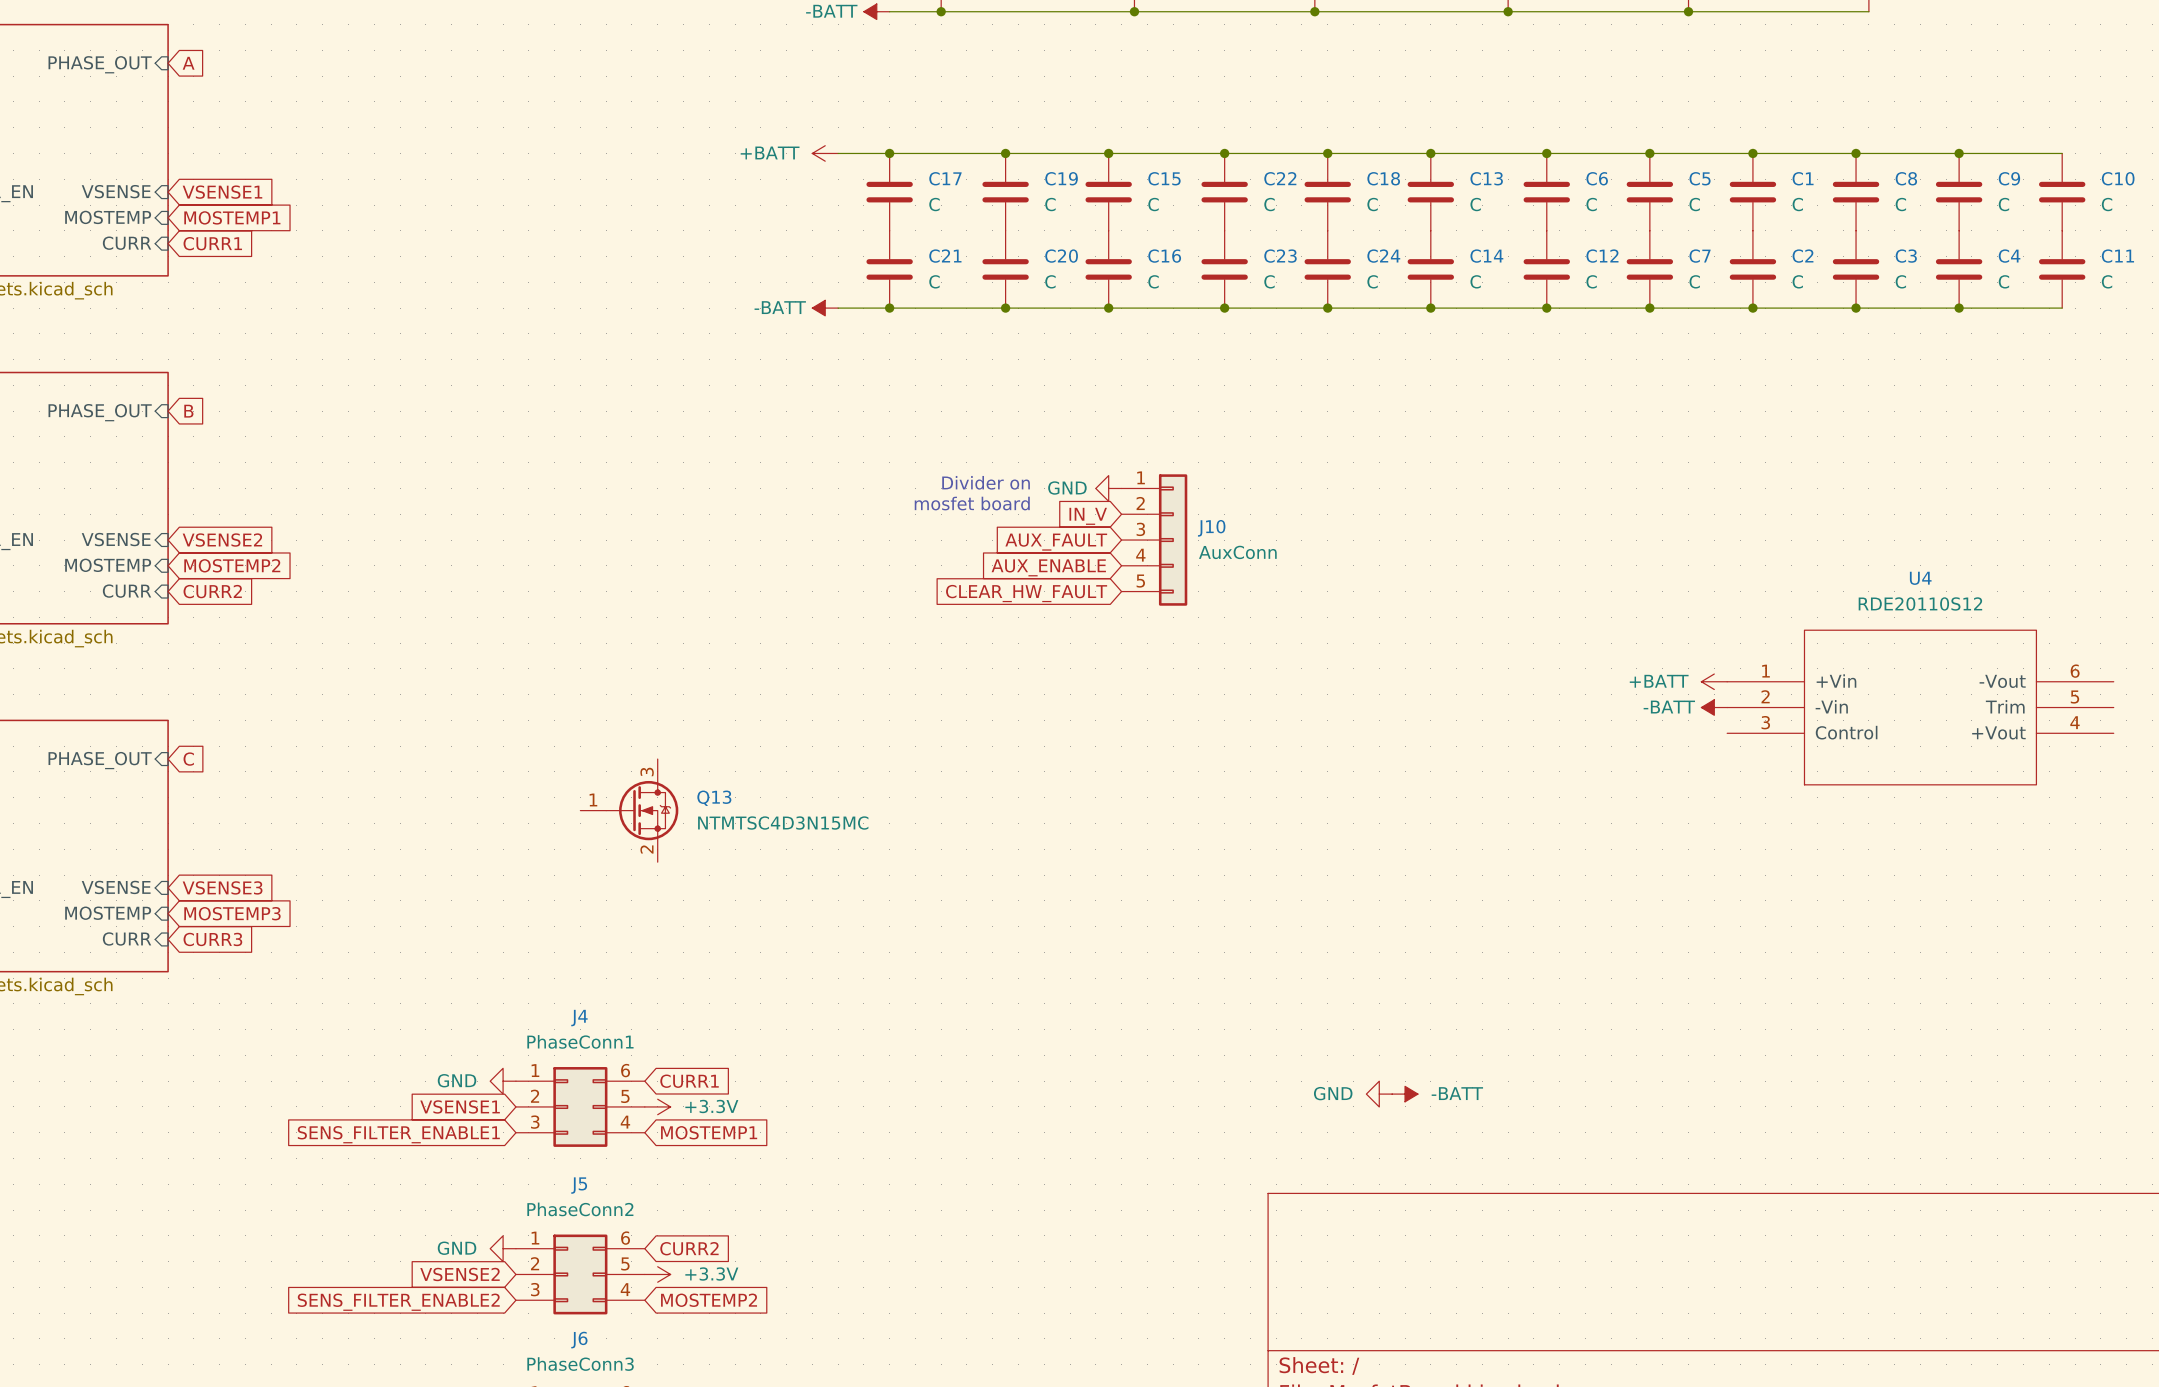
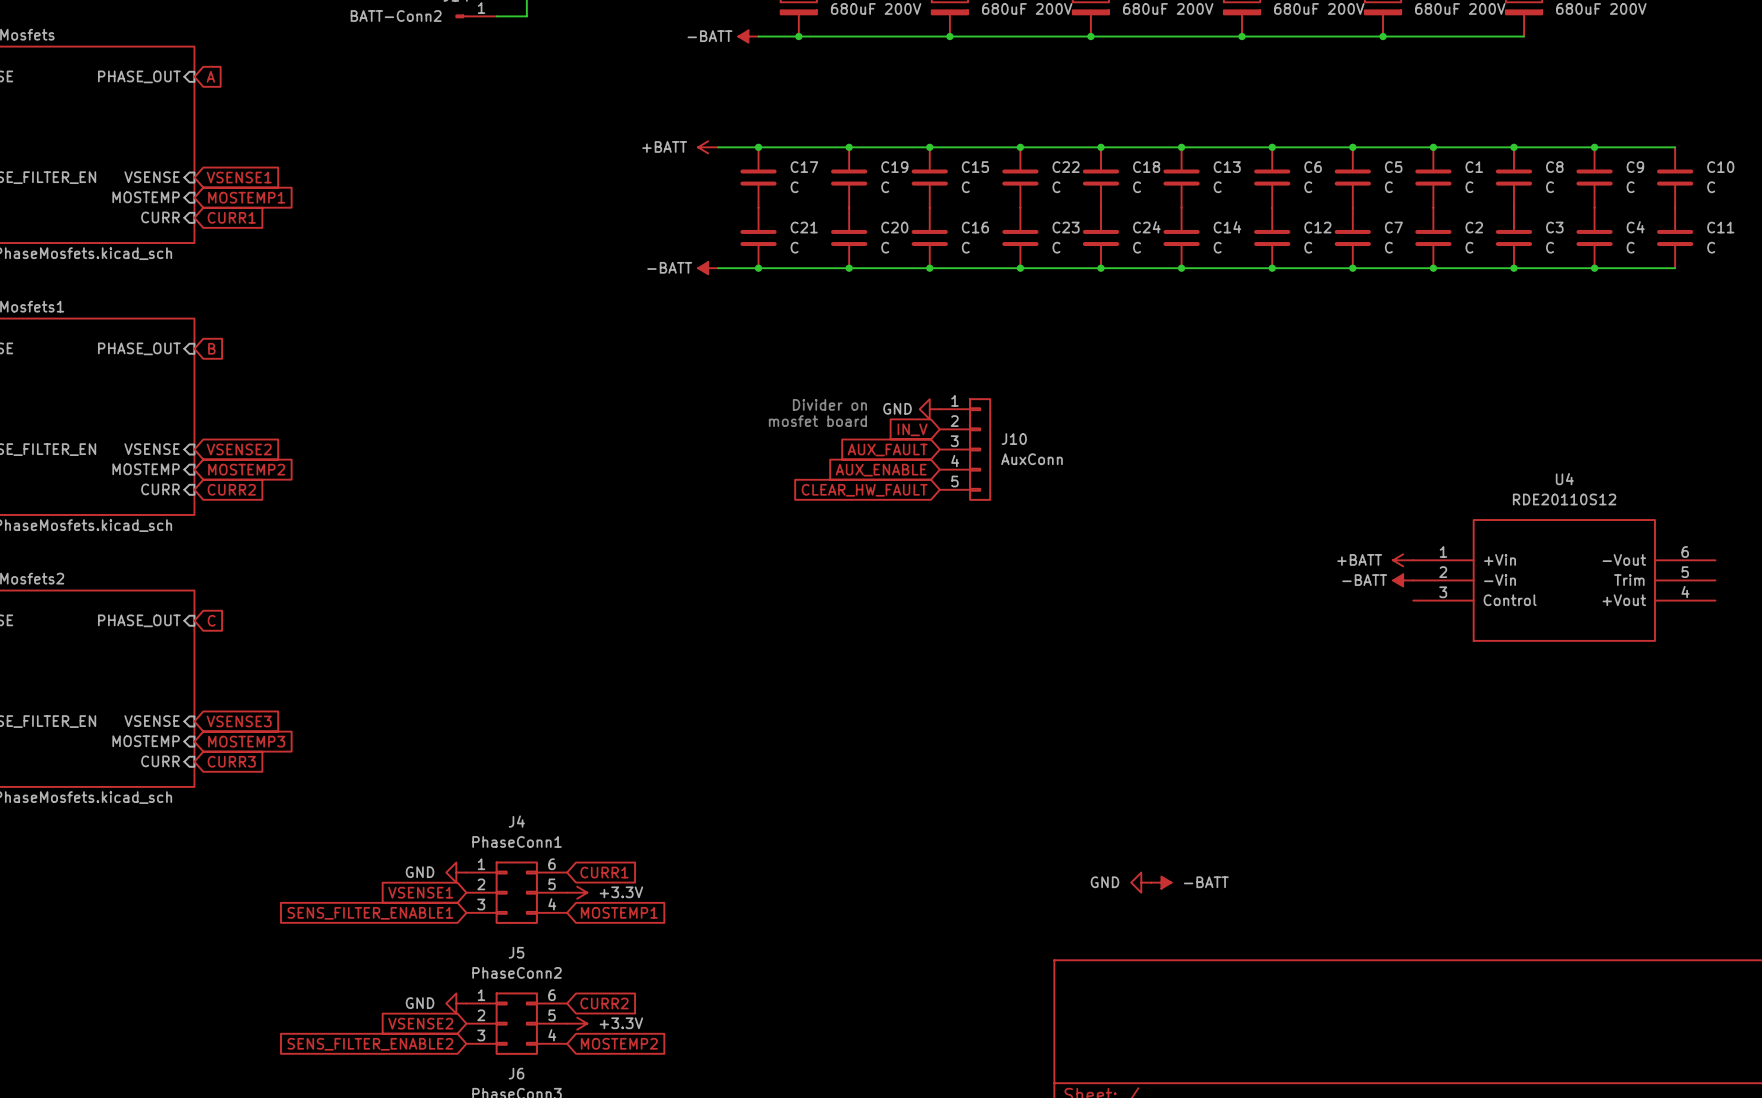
Q13: NTMTSC4D3N15MC (629, 810) -> none

